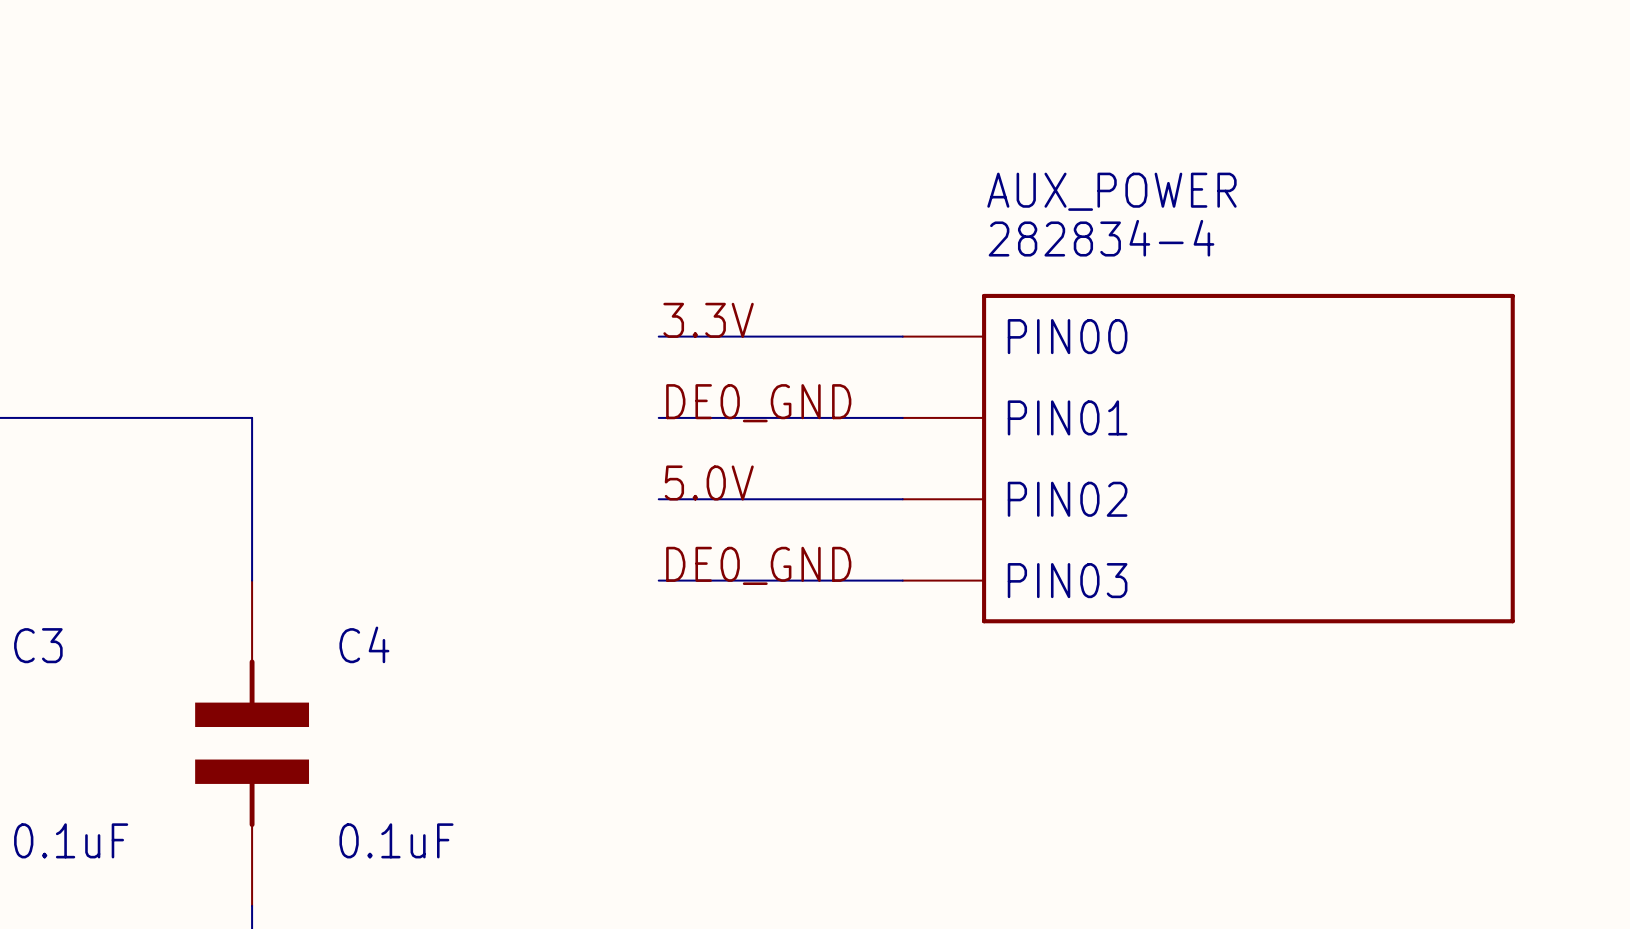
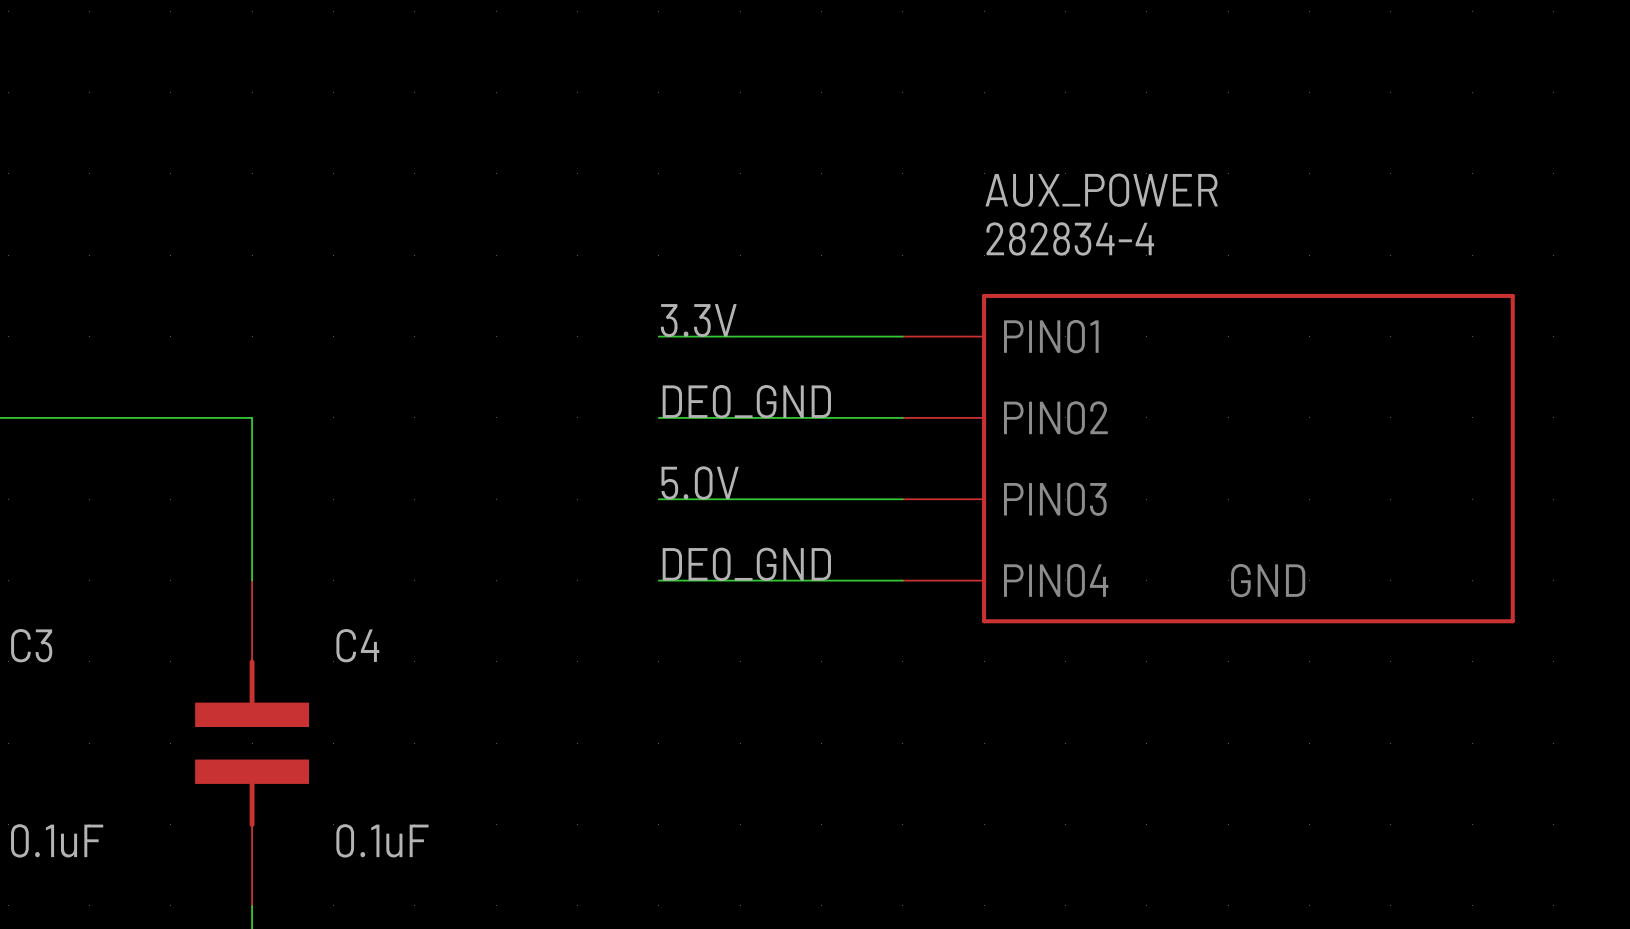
AUX_POWER text: PIN00 (1067, 336) -> PIN01 (1051, 336)
AUX_POWER text: PIN01 (1067, 417) -> PIN02 (1055, 417)
AUX_POWER text: PIN02 (1067, 499) -> PIN03 (1055, 499)
AUX_POWER text: PIN03 (1067, 580) -> PIN04 (1056, 580)
AUX_POWER text: none -> GND (1268, 580)

